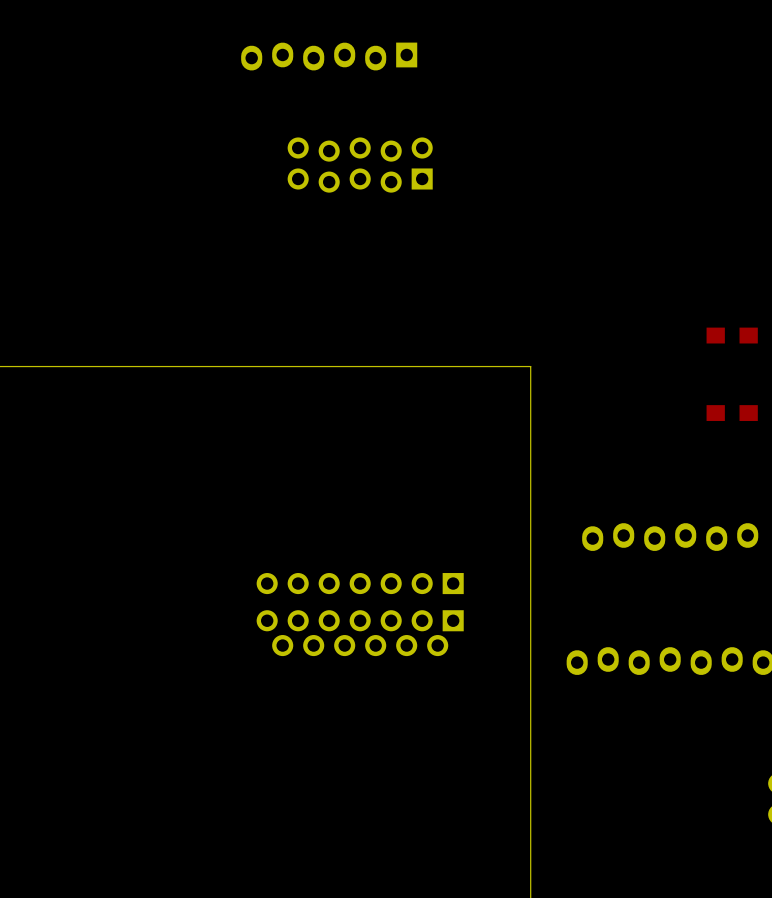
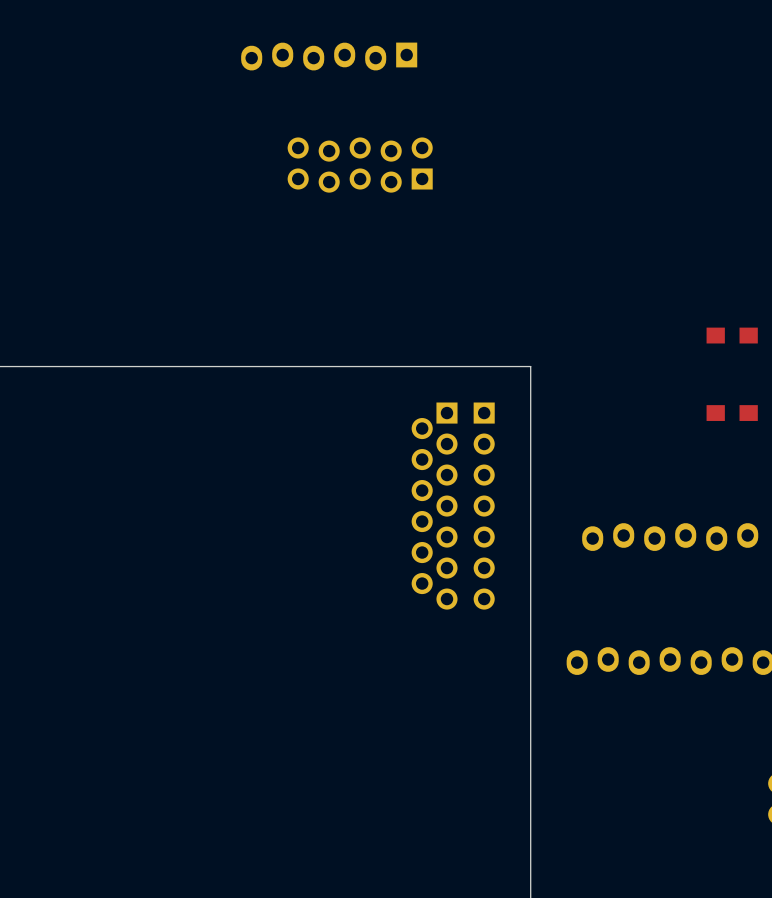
part: none -> (453, 506)
part: (360, 614) -> none

